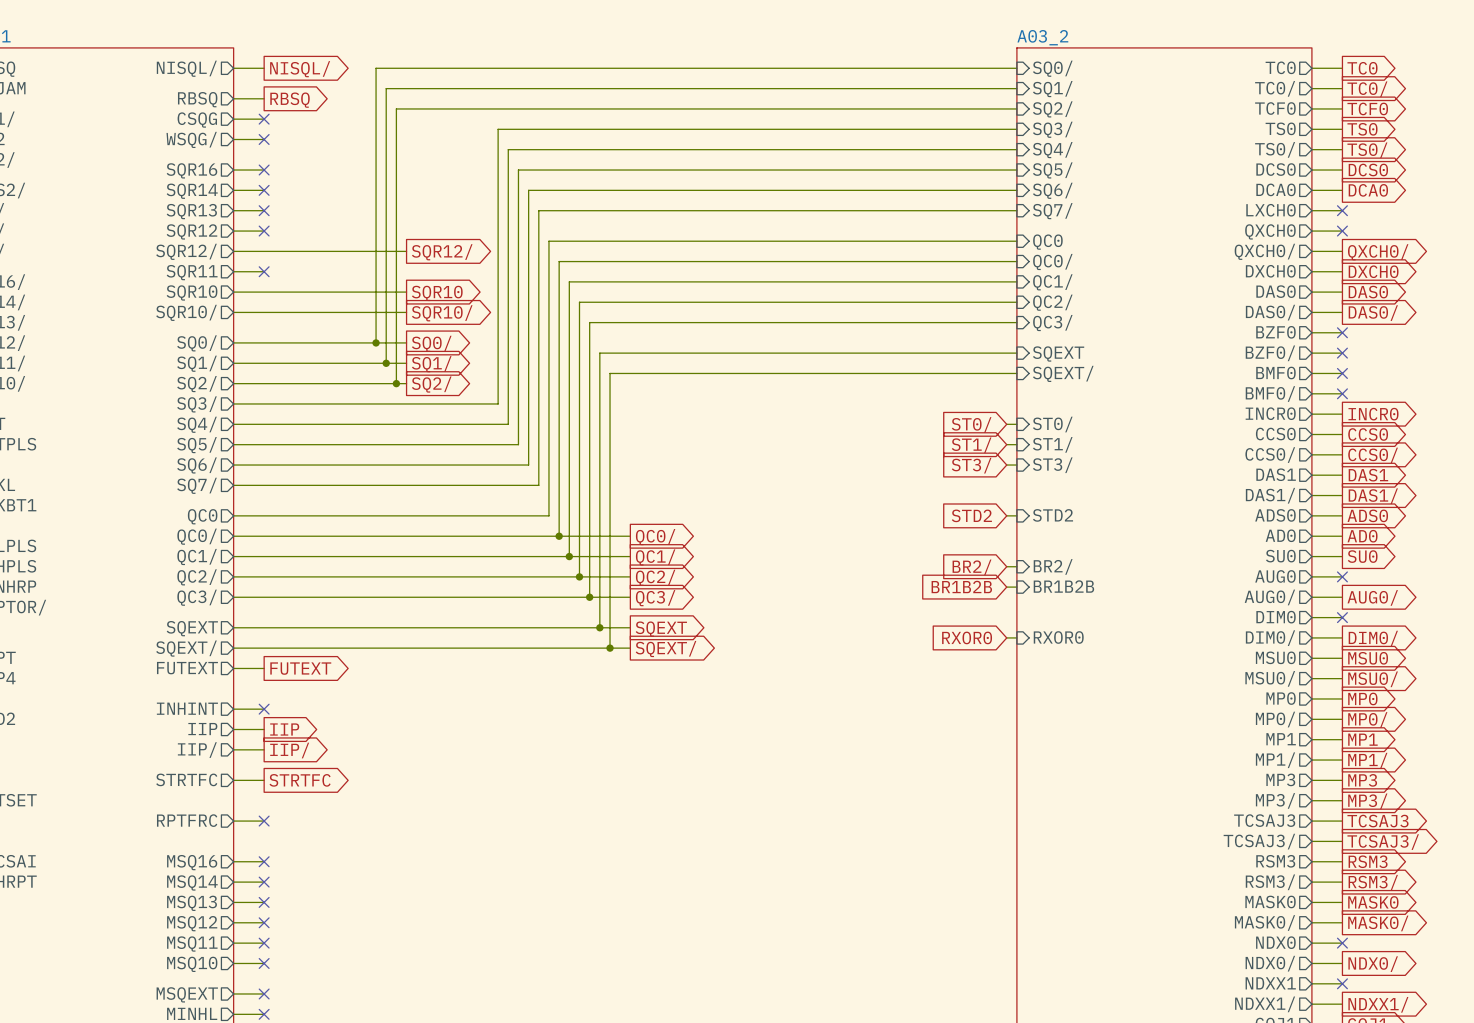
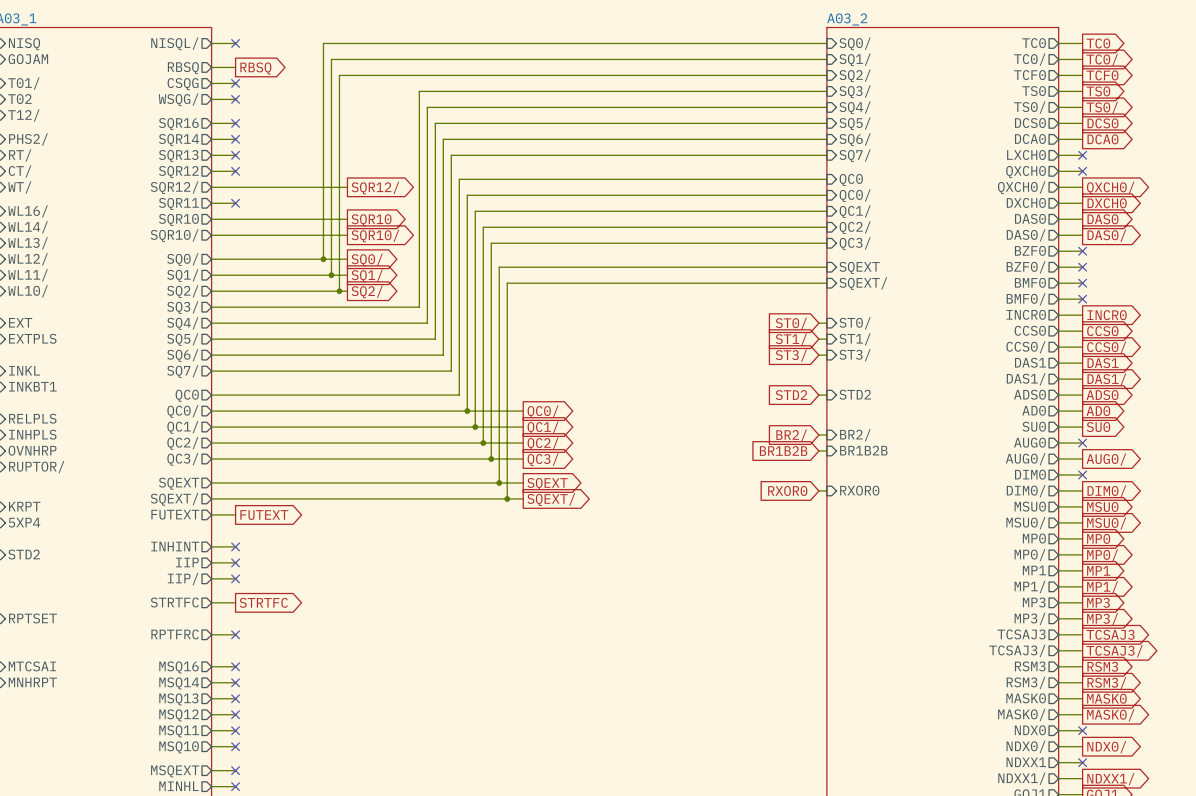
no-connect mark: none -> (235, 43)
global label: NISQL/ (300, 69) -> none
no-connect mark: none -> (235, 562)
global label: IIP (284, 729) -> none
no-connect mark: none -> (235, 578)
global label: IIP/ (289, 750) -> none

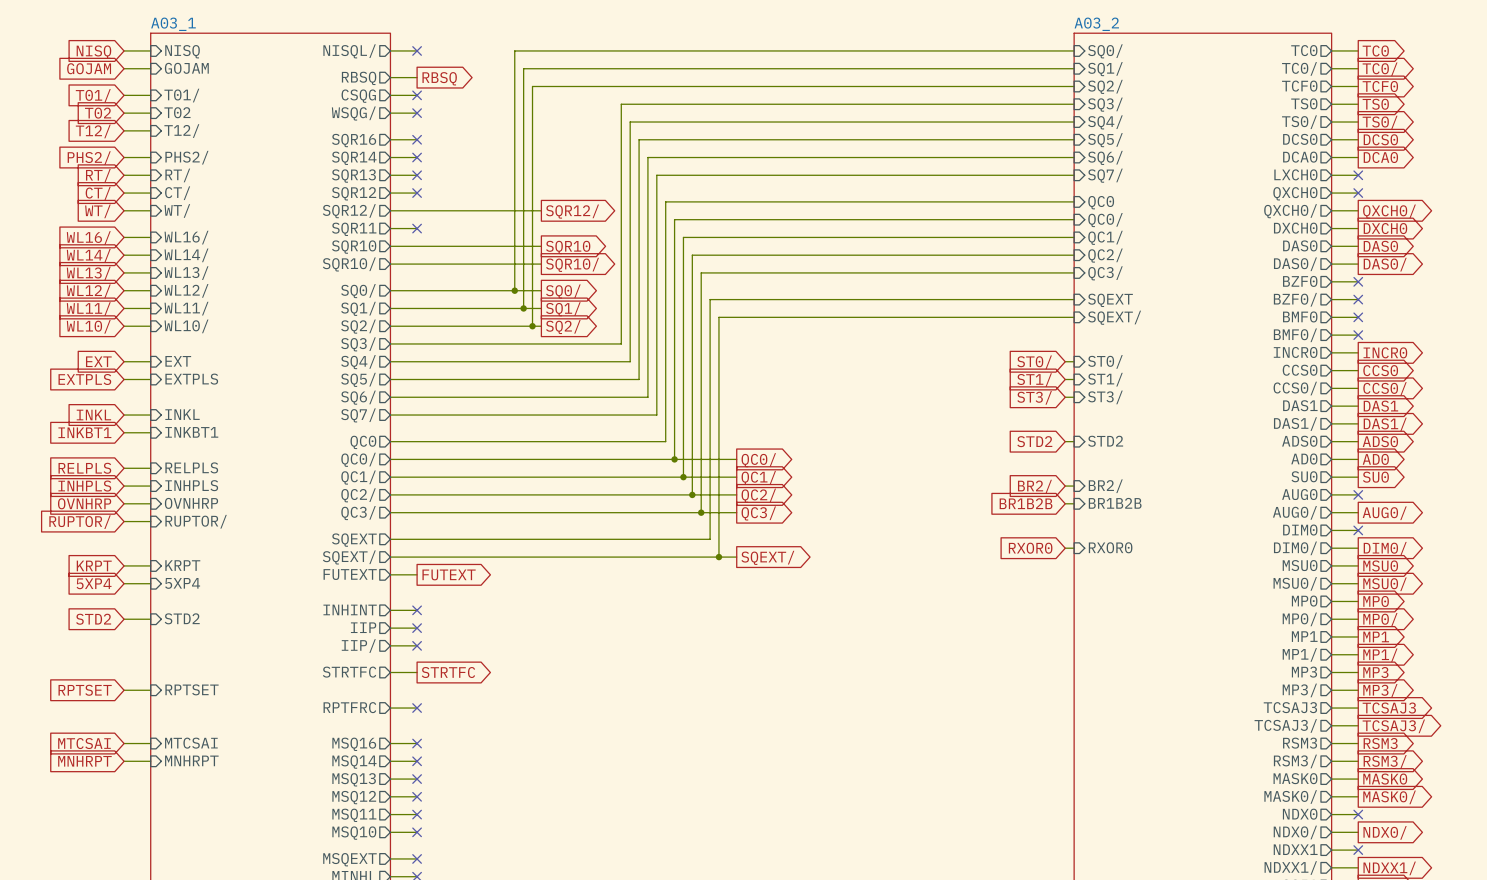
wire: (499, 482) (523, 482) -> none
junction: (499, 482) -> none
global label: SQEXT (547, 484) -> none

